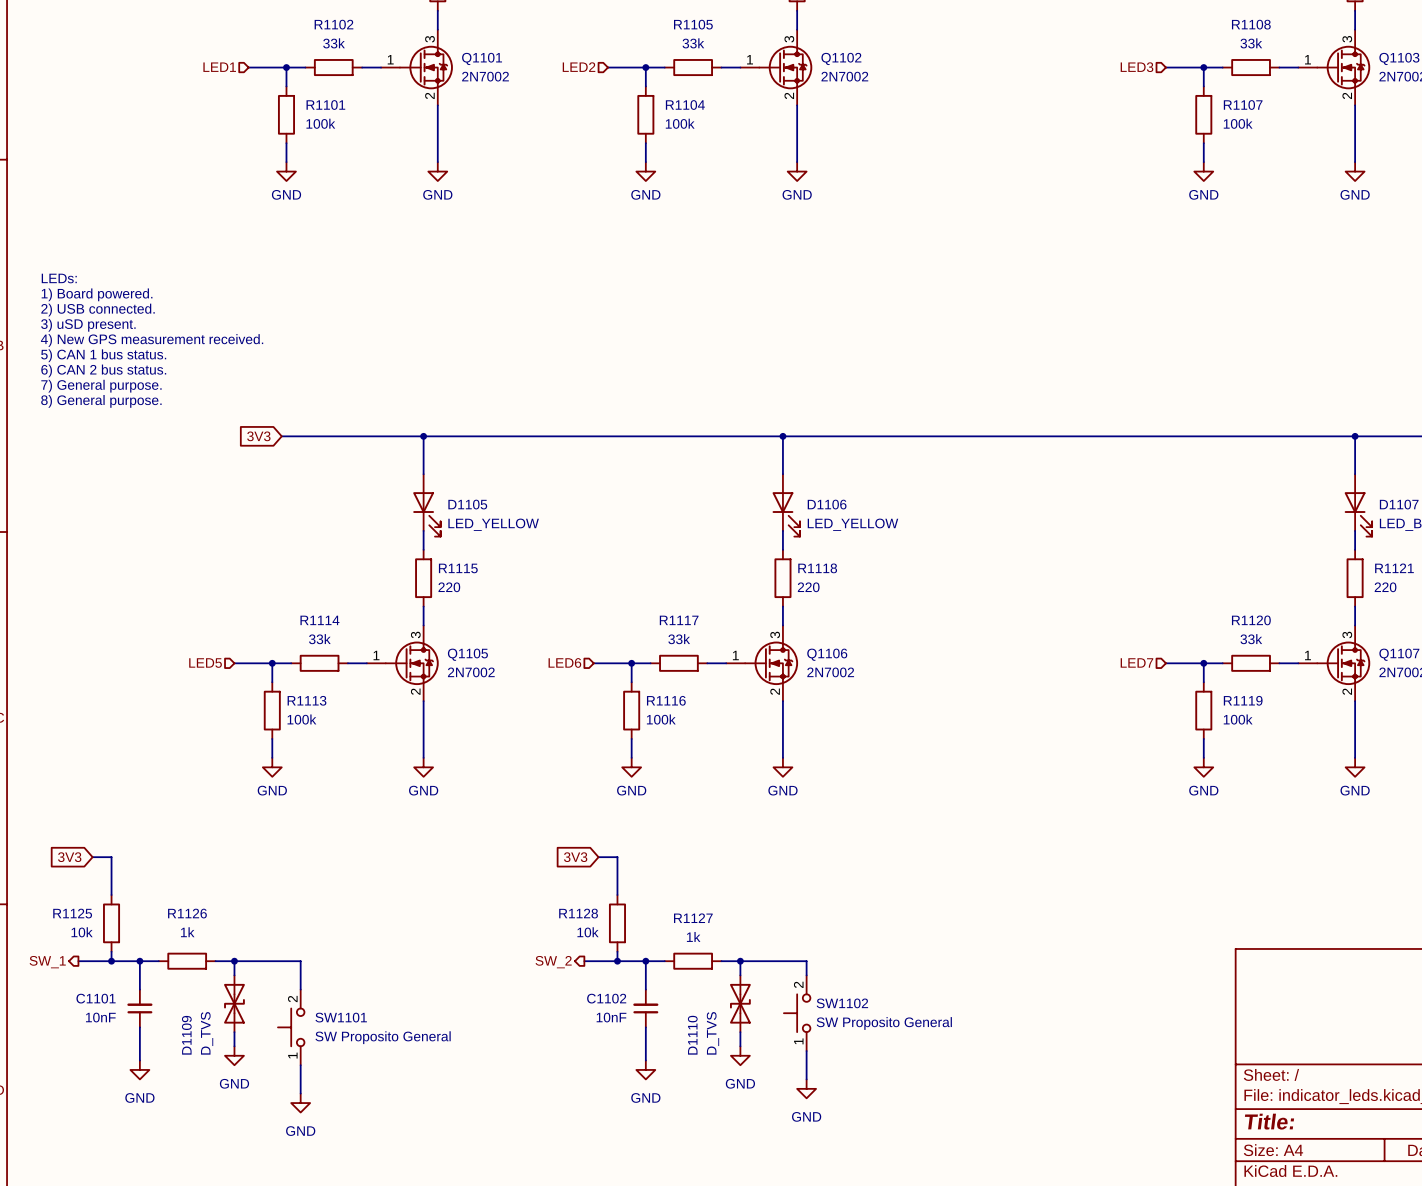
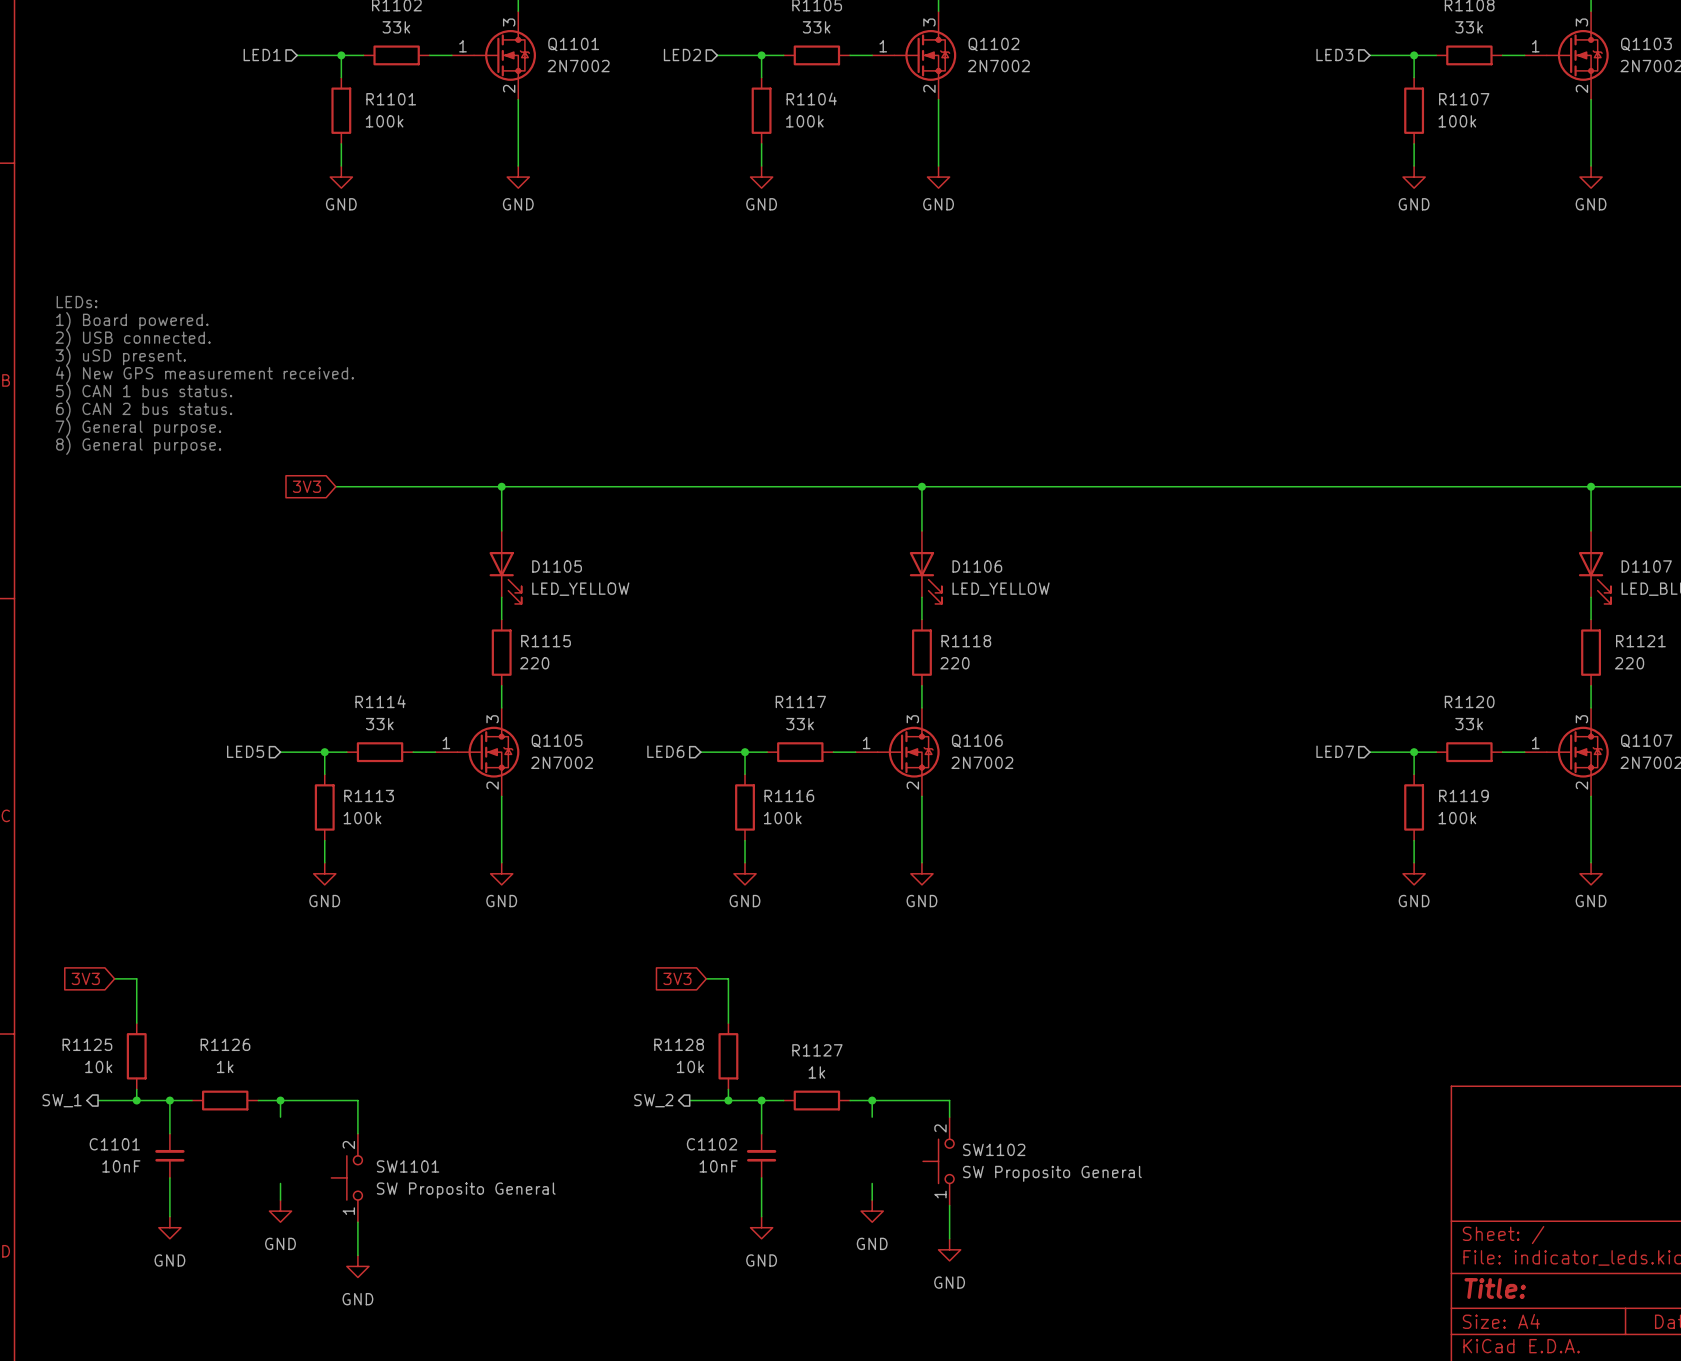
D1109: D_TVS (234, 1003) -> none
D1110: D_TVS (740, 1003) -> none

